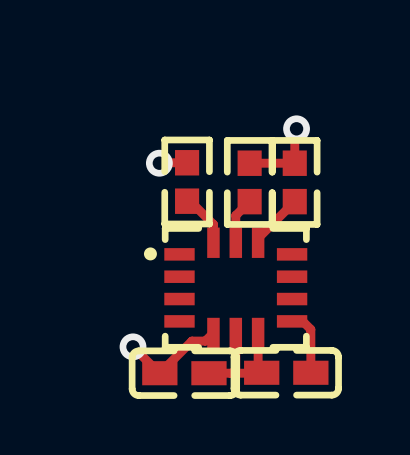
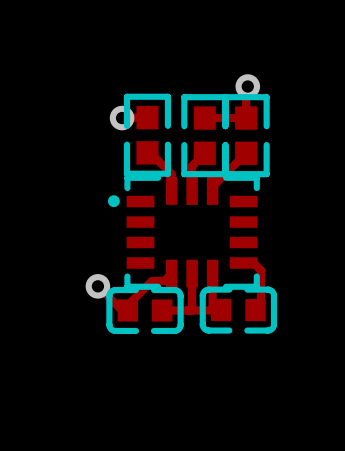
part footprint: [128, 347, 241, 399] -> [106, 286, 184, 335]
part footprint: [230, 347, 342, 399] -> [199, 286, 278, 334]

